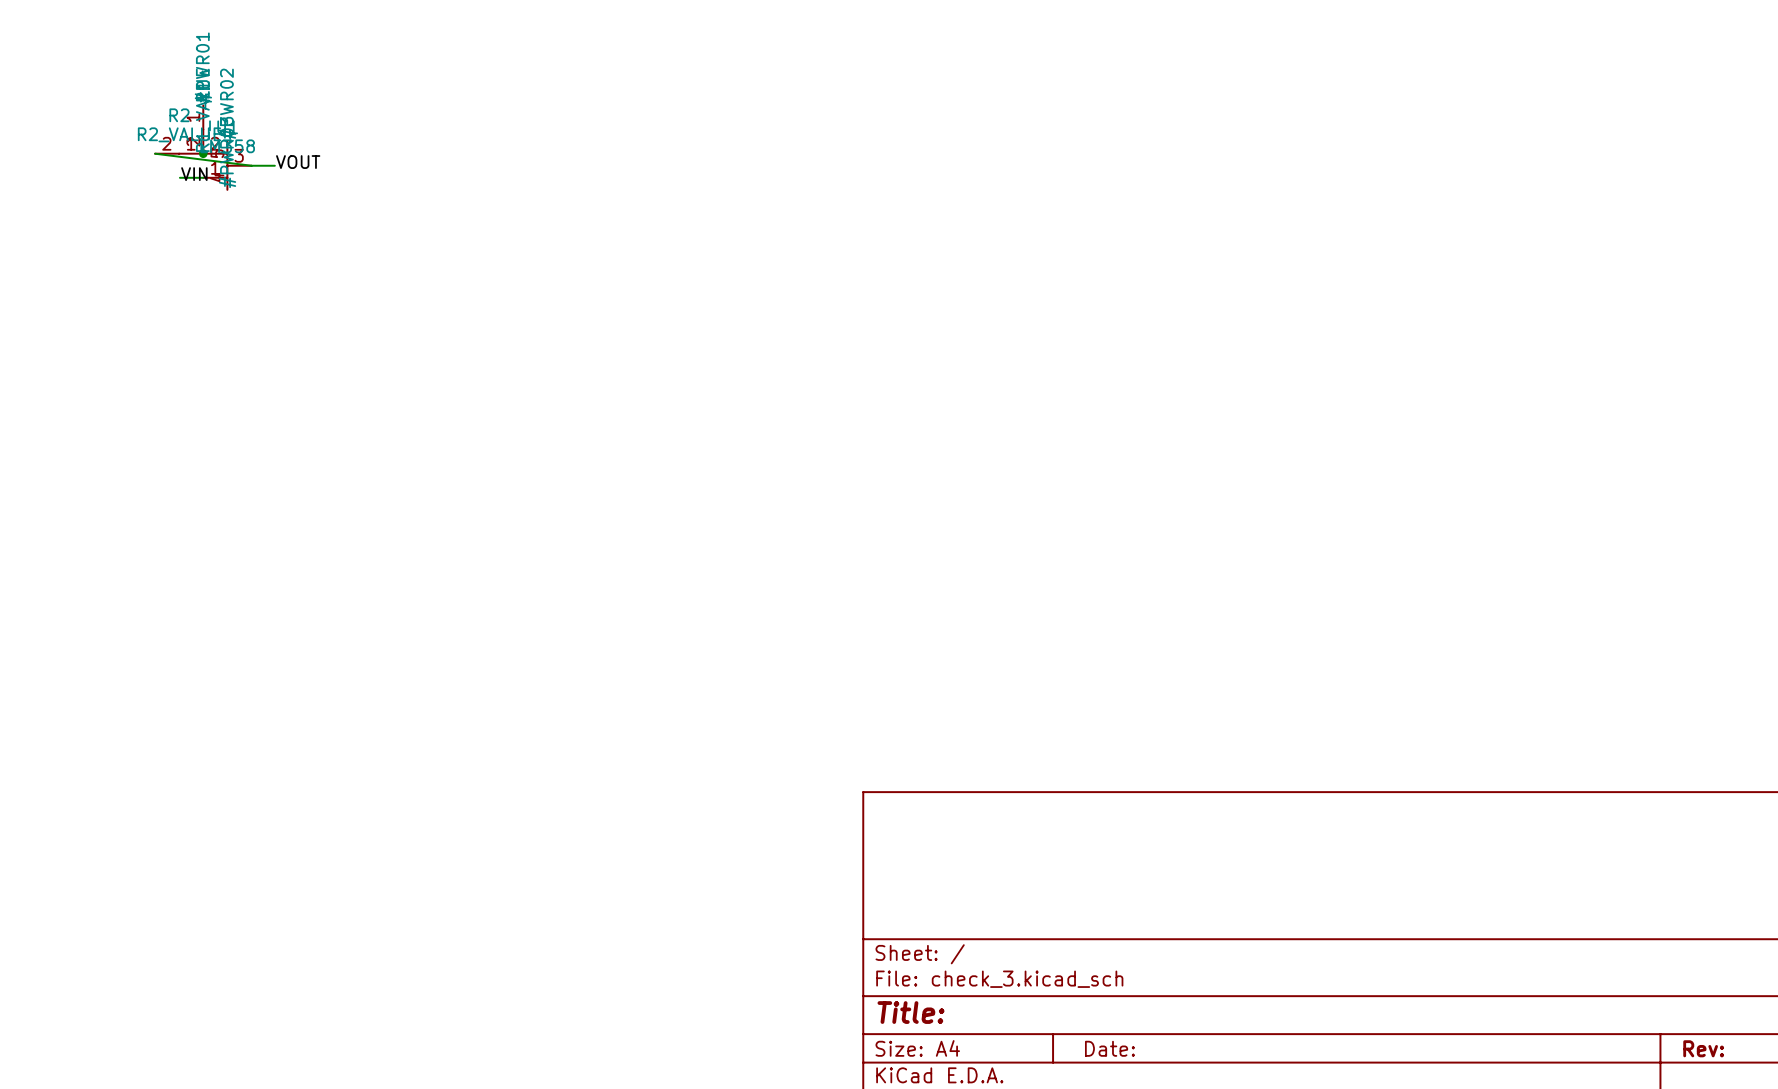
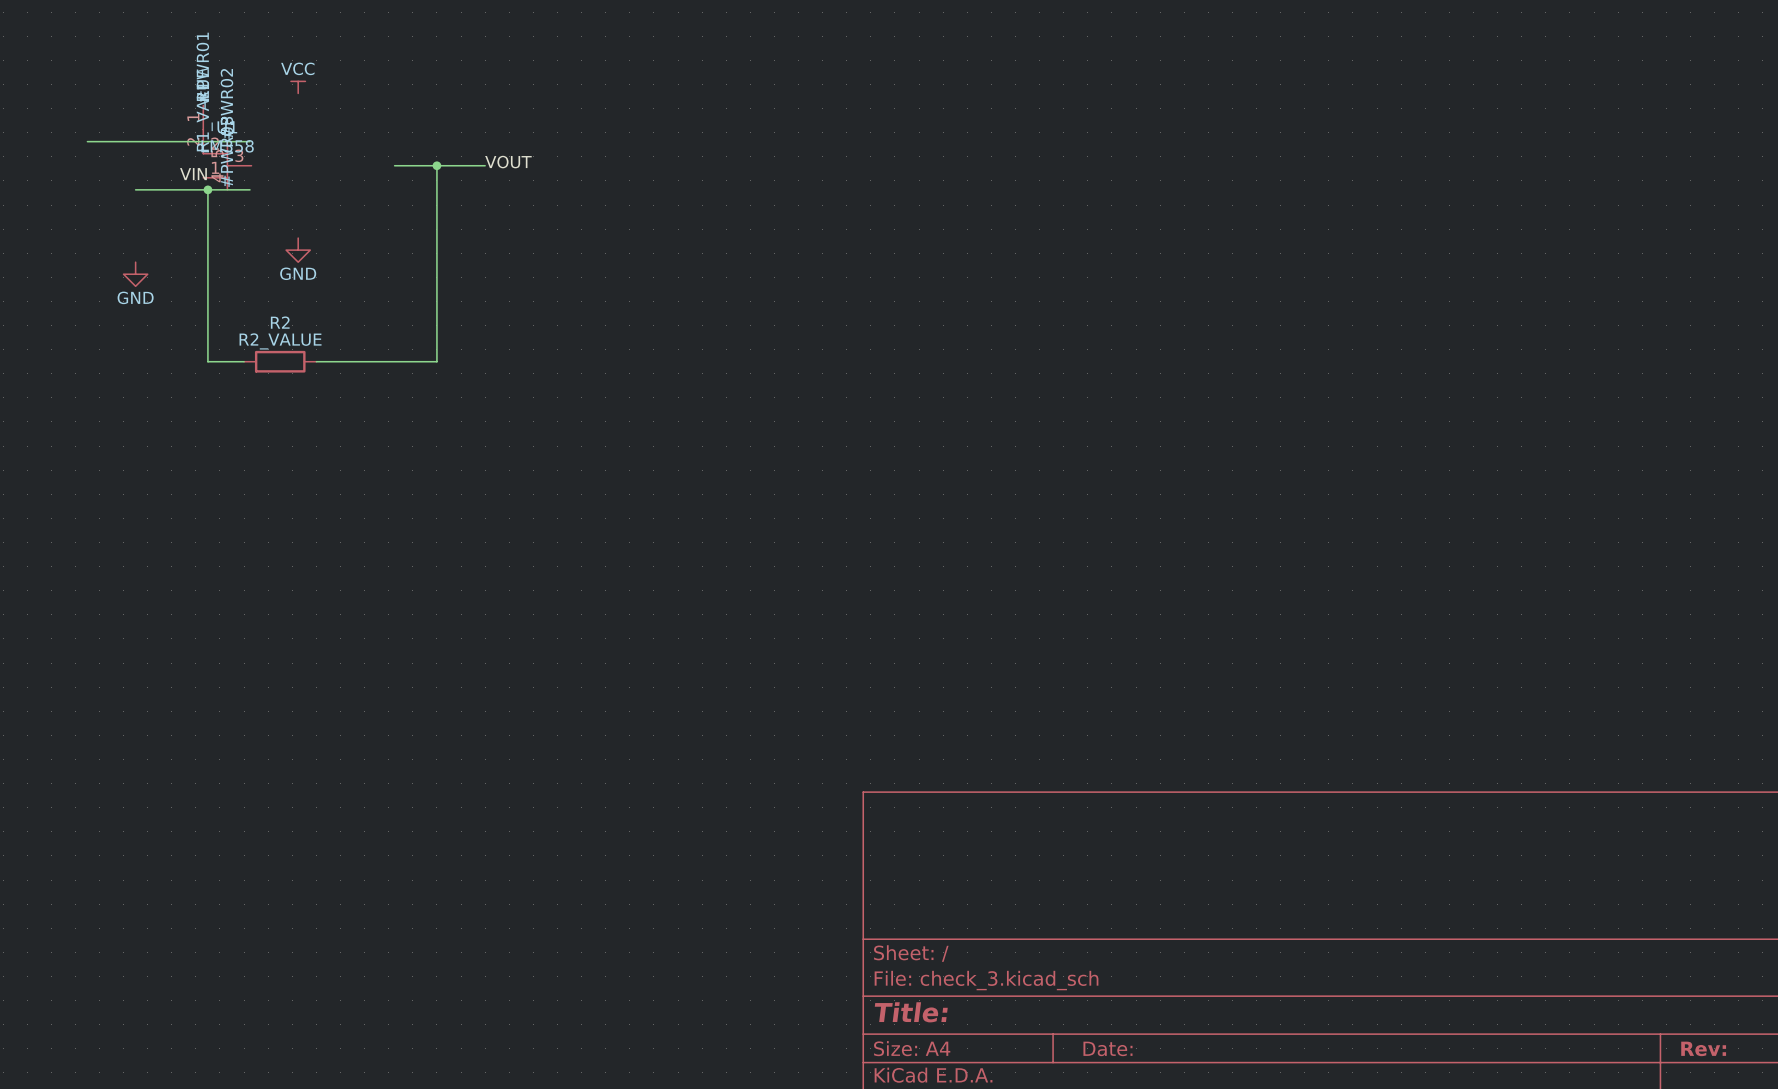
power symbol: none -> VCC (298, 87)
wire: none -> (87, 141) (249, 141)
wire: (155, 153) (251, 165) (274, 165) -> none
R2 symbol: [155, 153, 204, 154] -> [244, 350, 317, 373]
junction position: (203, 153) -> (207, 189)
label position: VOUT (298, 162) -> VOUT (508, 162)
wire: none -> (394, 165) (485, 165)
wire: none -> (436, 165) (436, 361) (316, 361)
junction: none -> (436, 165)
wire: (179, 177) (203, 177) -> none
wire: none -> (135, 189) (249, 189)
wire: none -> (207, 189) (207, 361) (244, 361)
power symbol: none -> GND (298, 250)
power symbol: none -> GND (135, 274)

